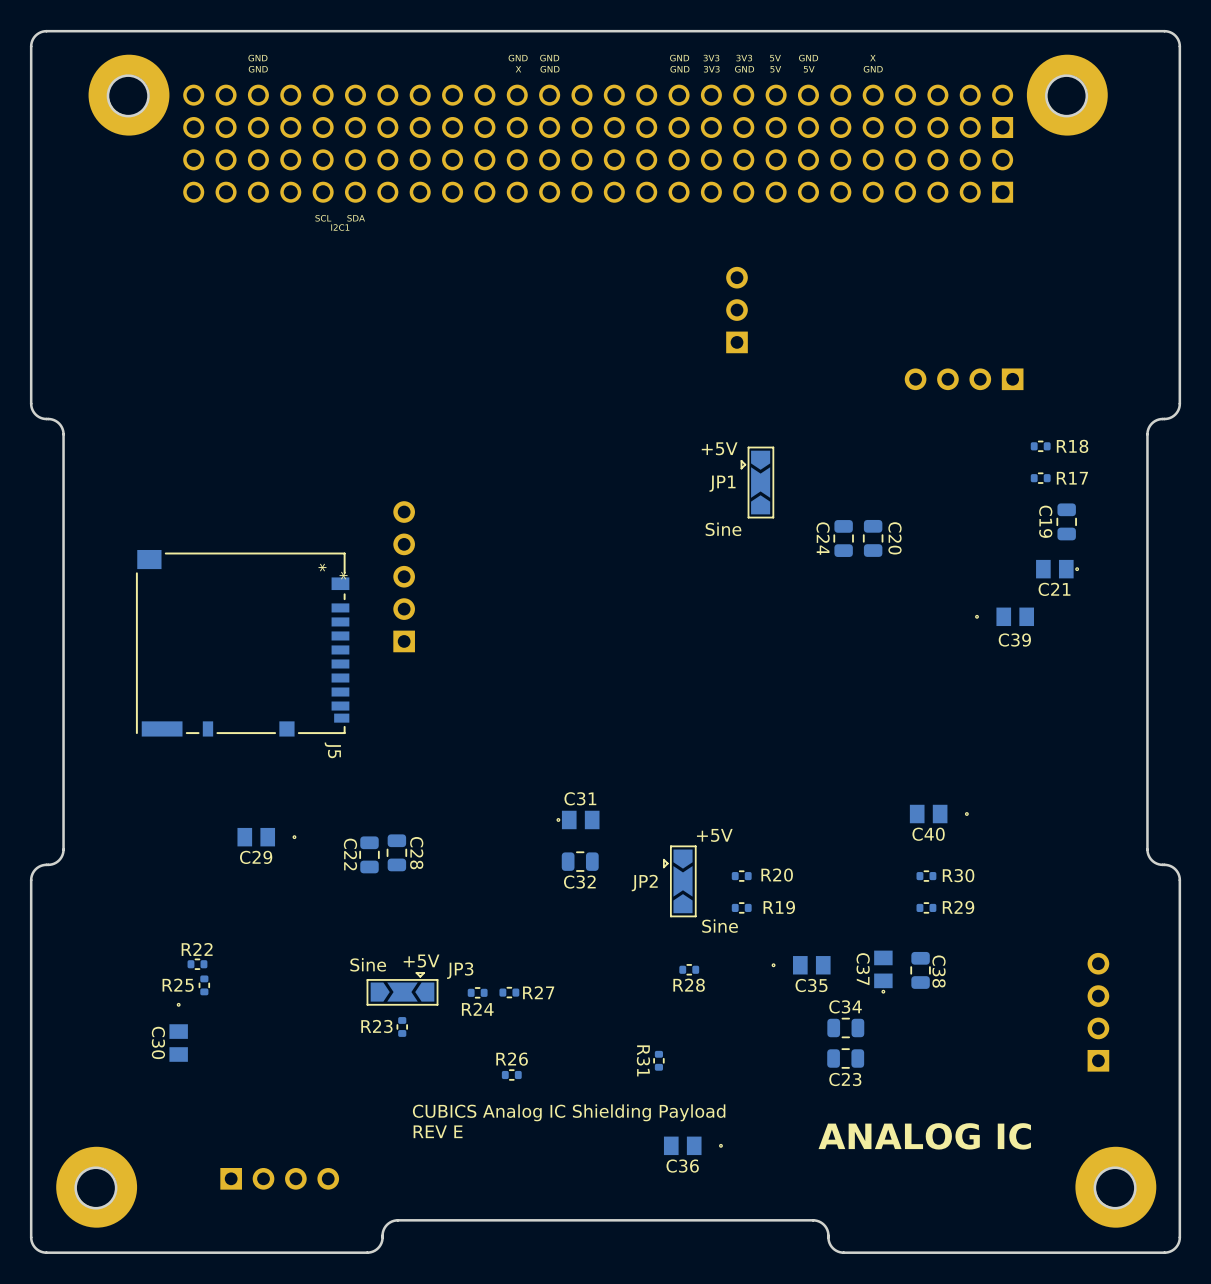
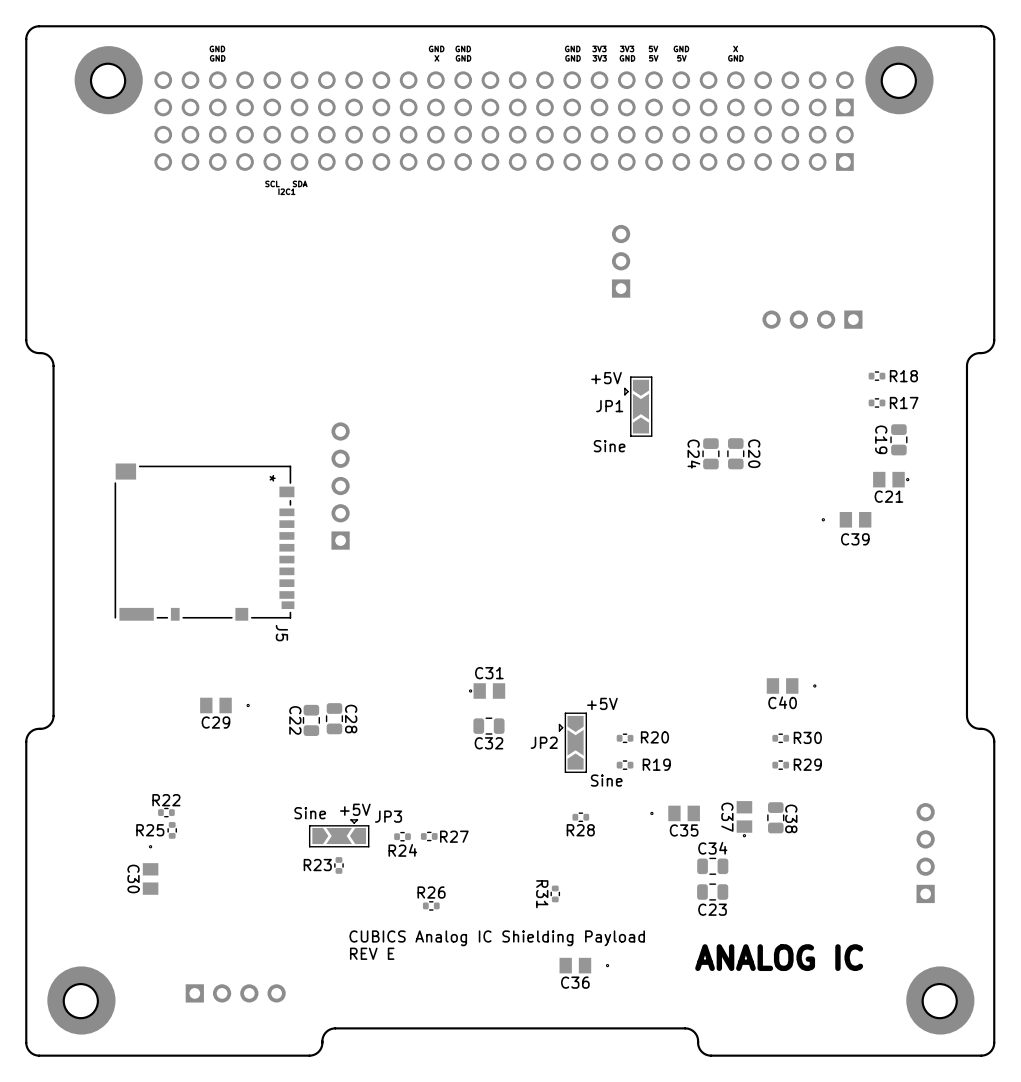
J5 text: * (343, 575) -> none

